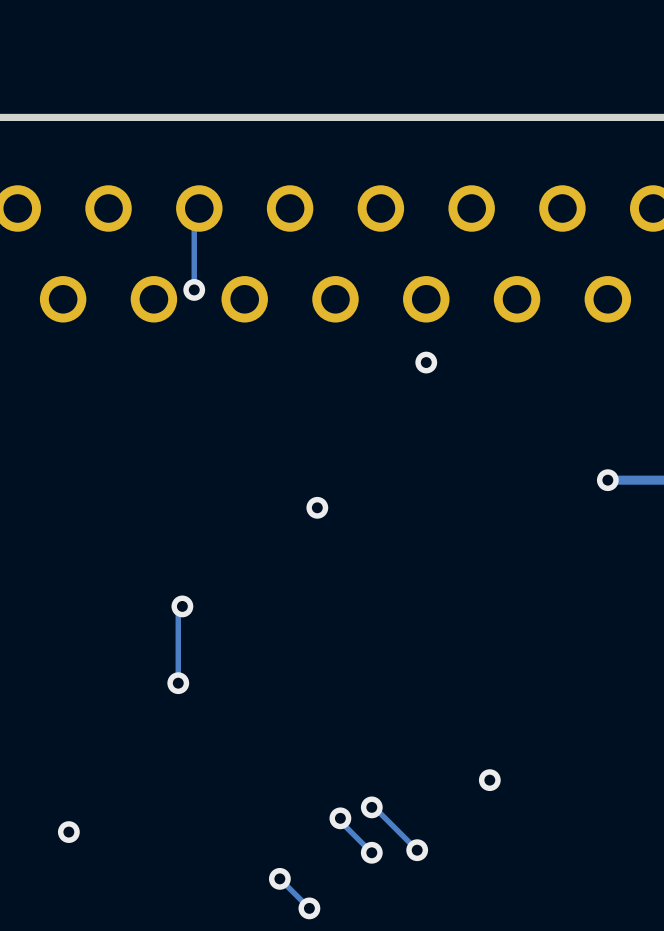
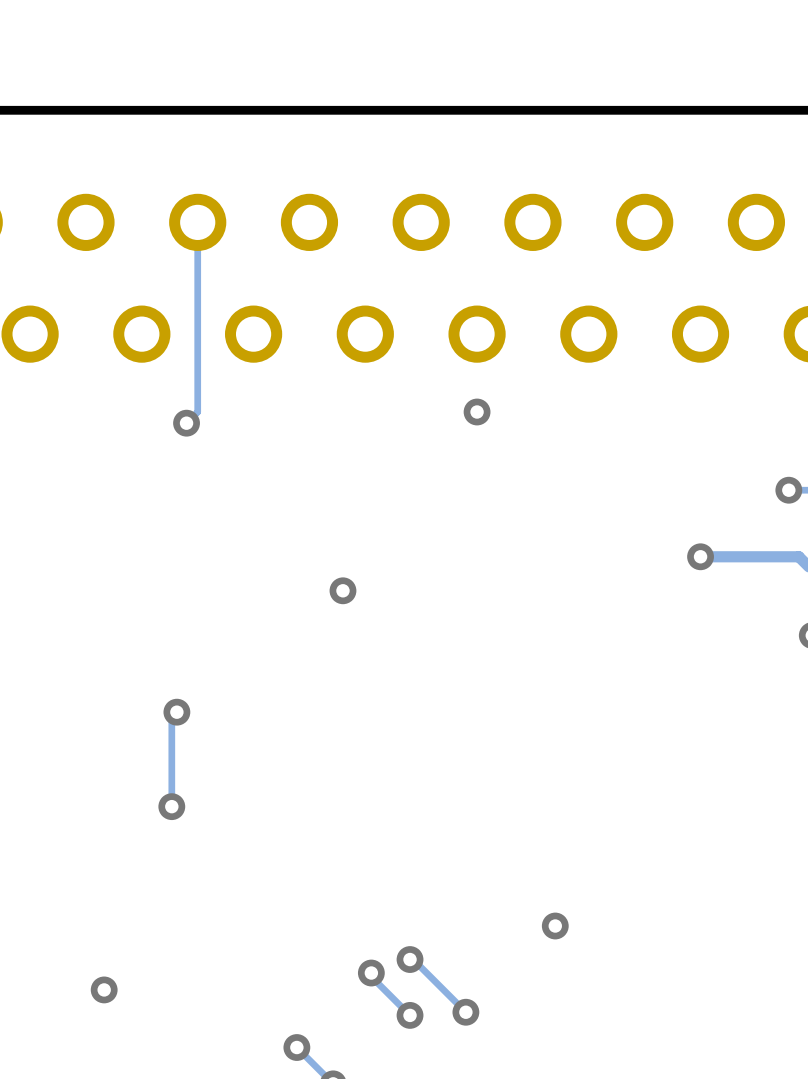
track: (199, 208) (194, 213) (194, 289) -> (197, 222) (197, 412) (186, 423)
via position: (194, 289) -> (186, 423)
via position: (68, 832) -> (104, 989)

